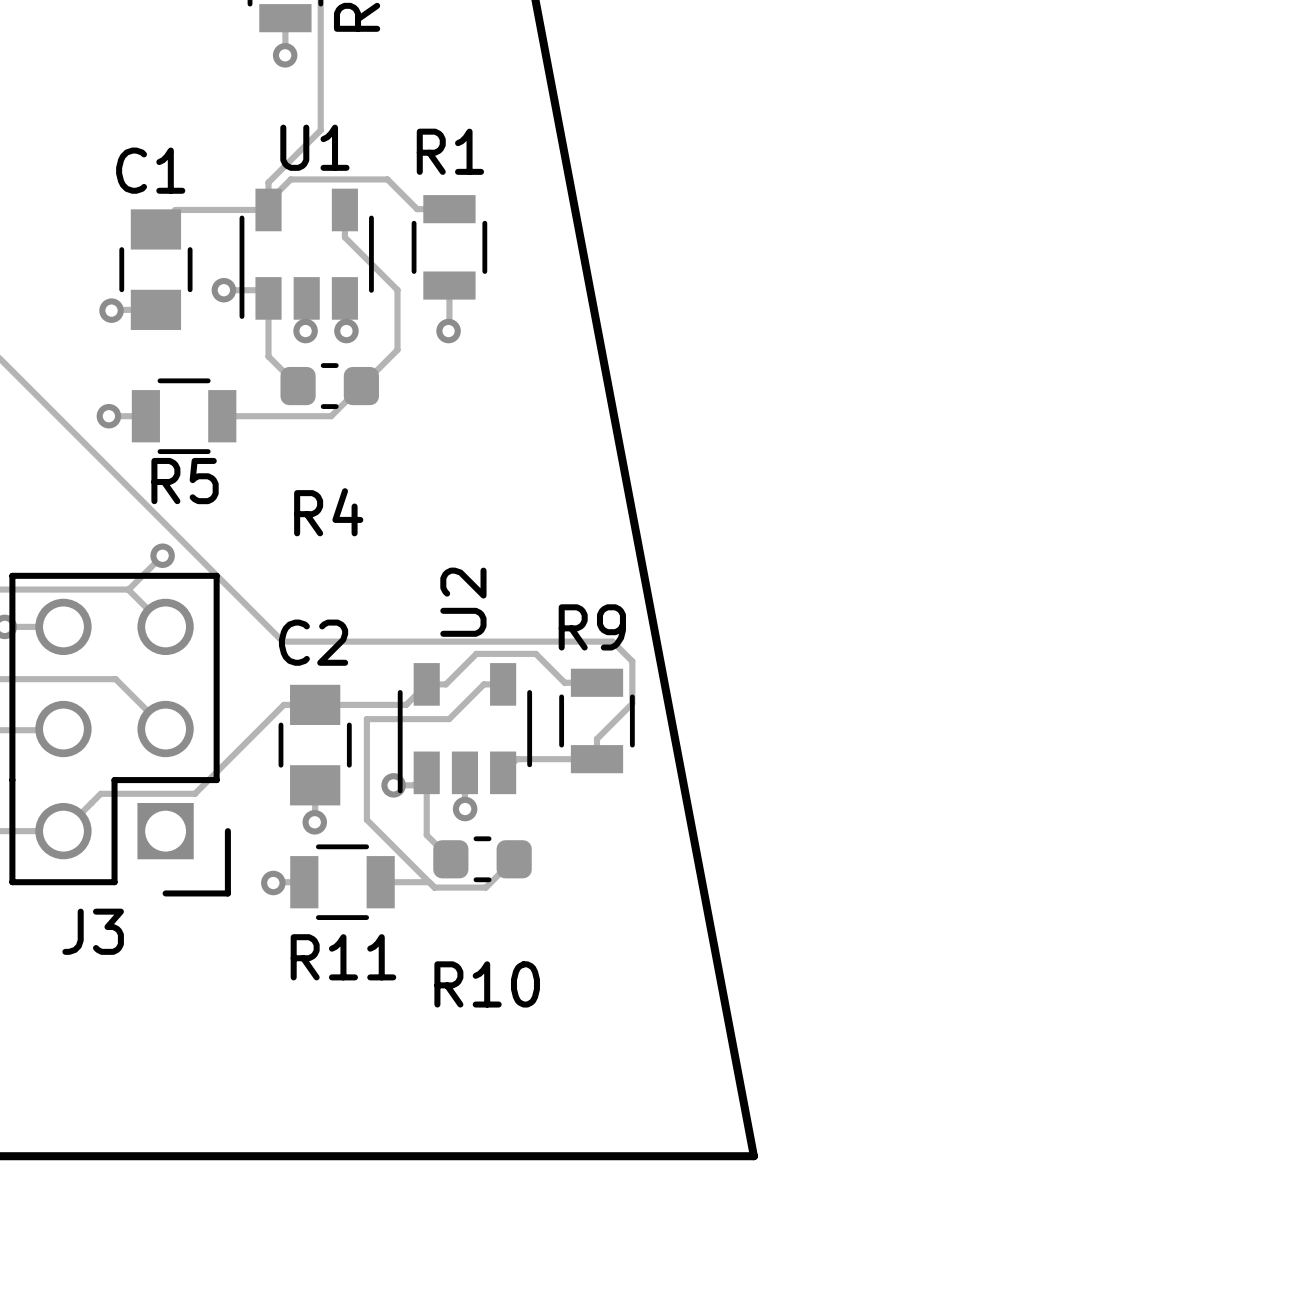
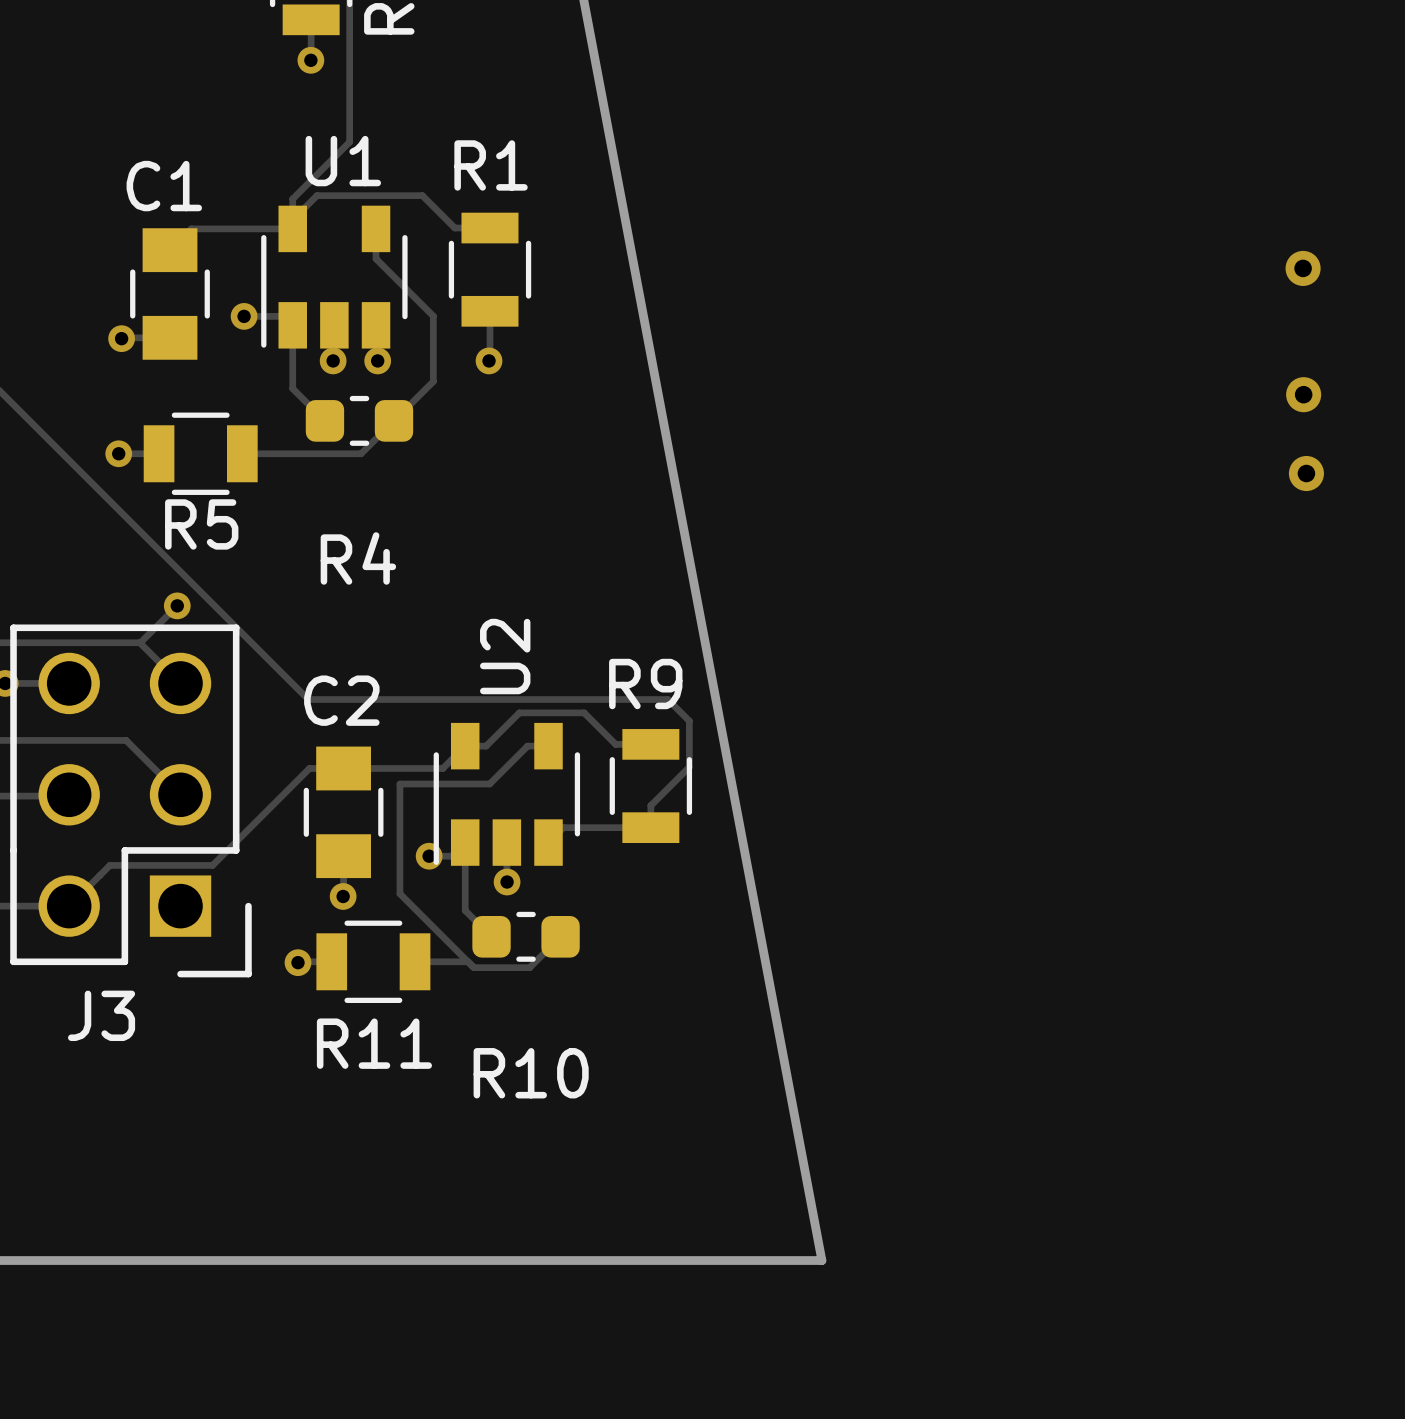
via: none -> (1303, 268)
via: none -> (1303, 394)
via: none -> (1306, 473)

